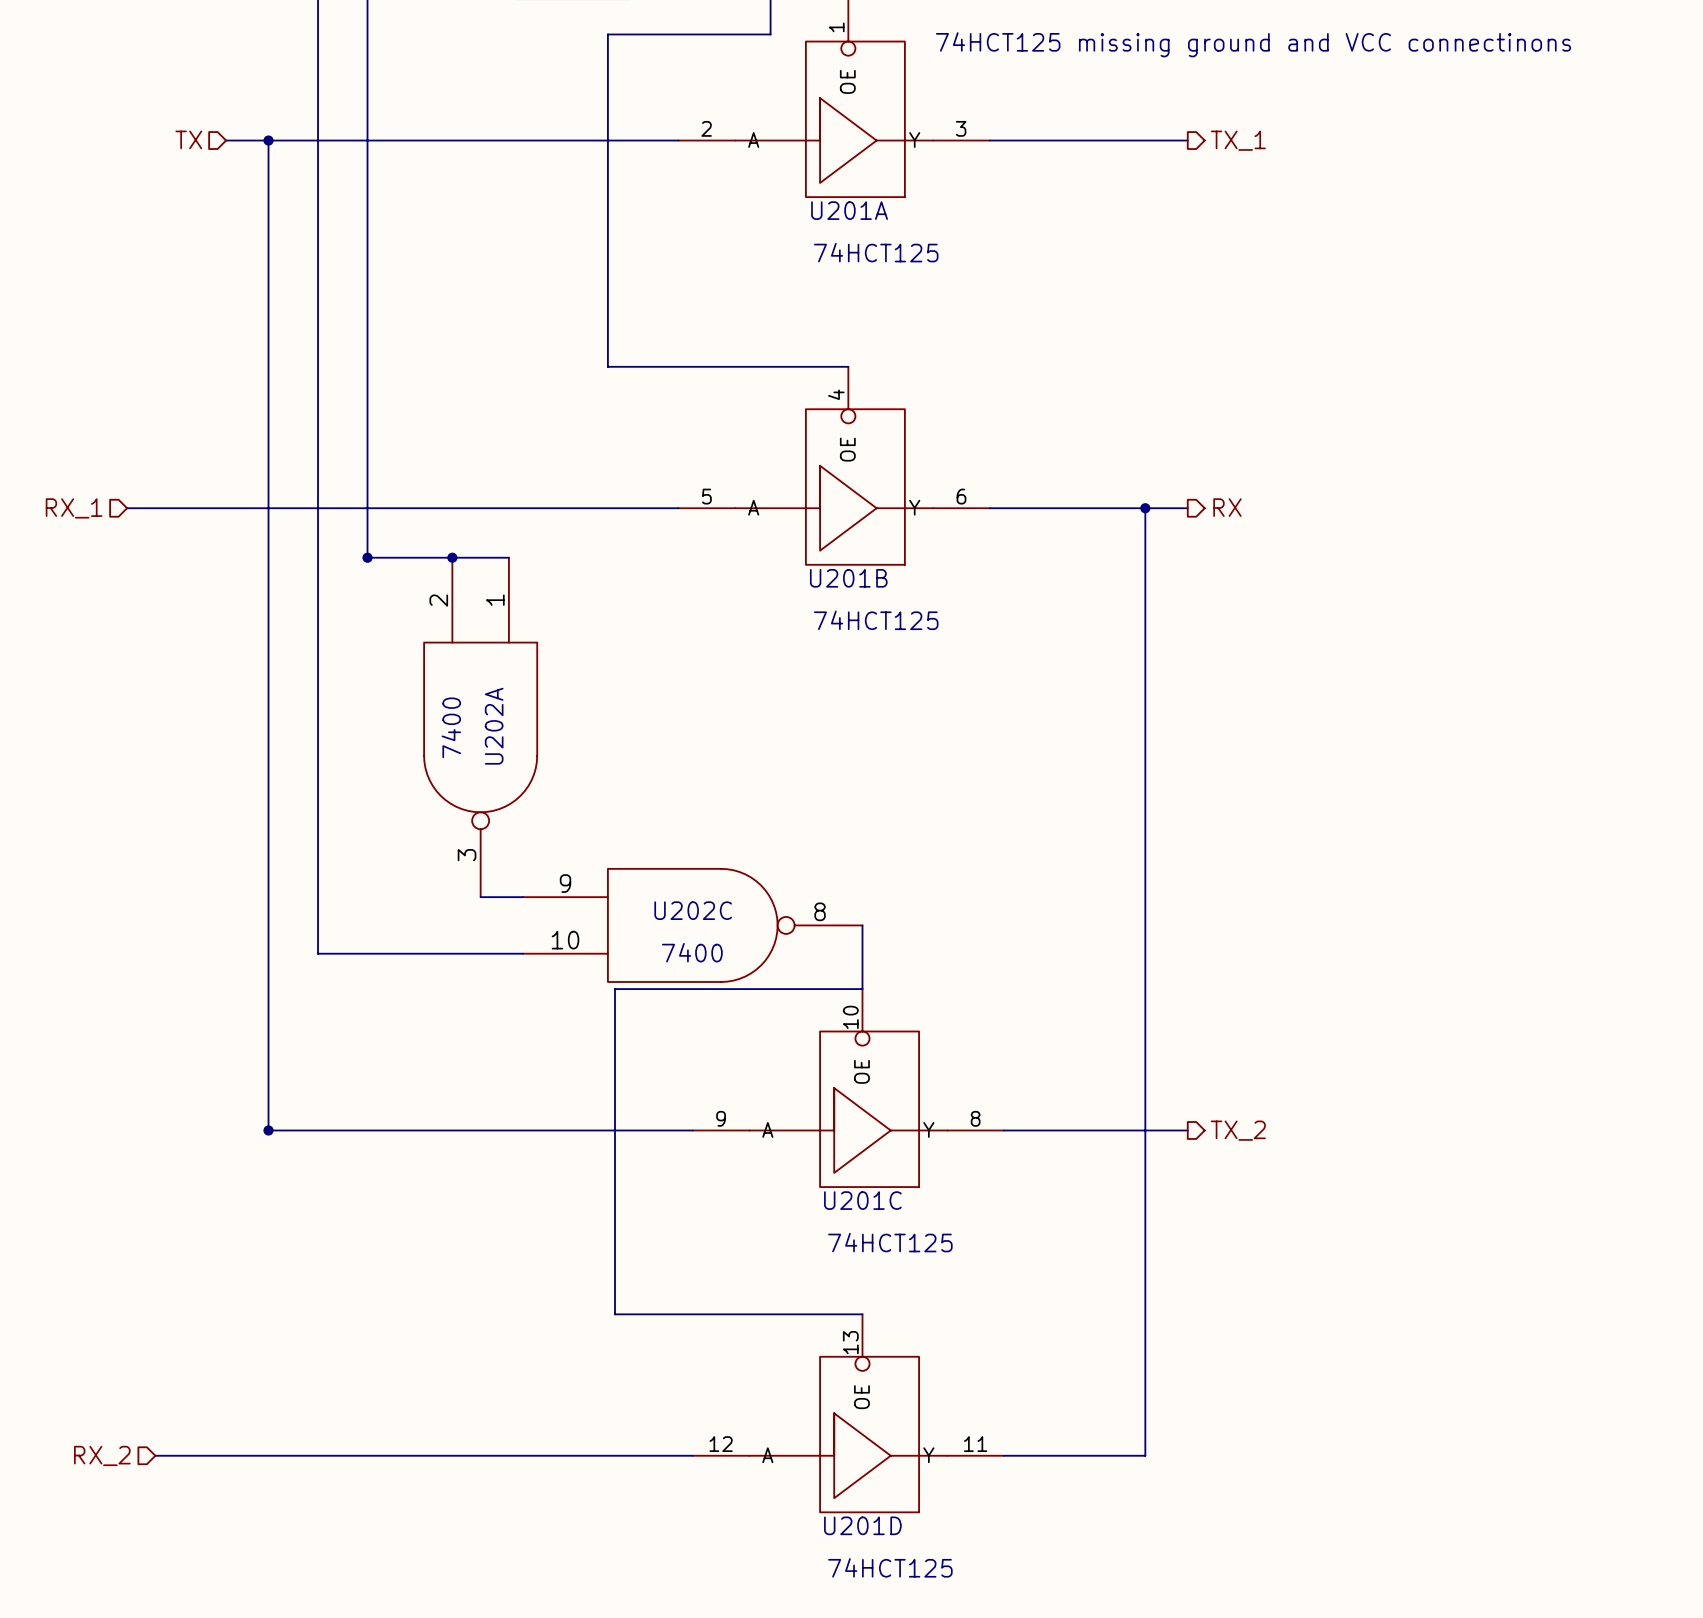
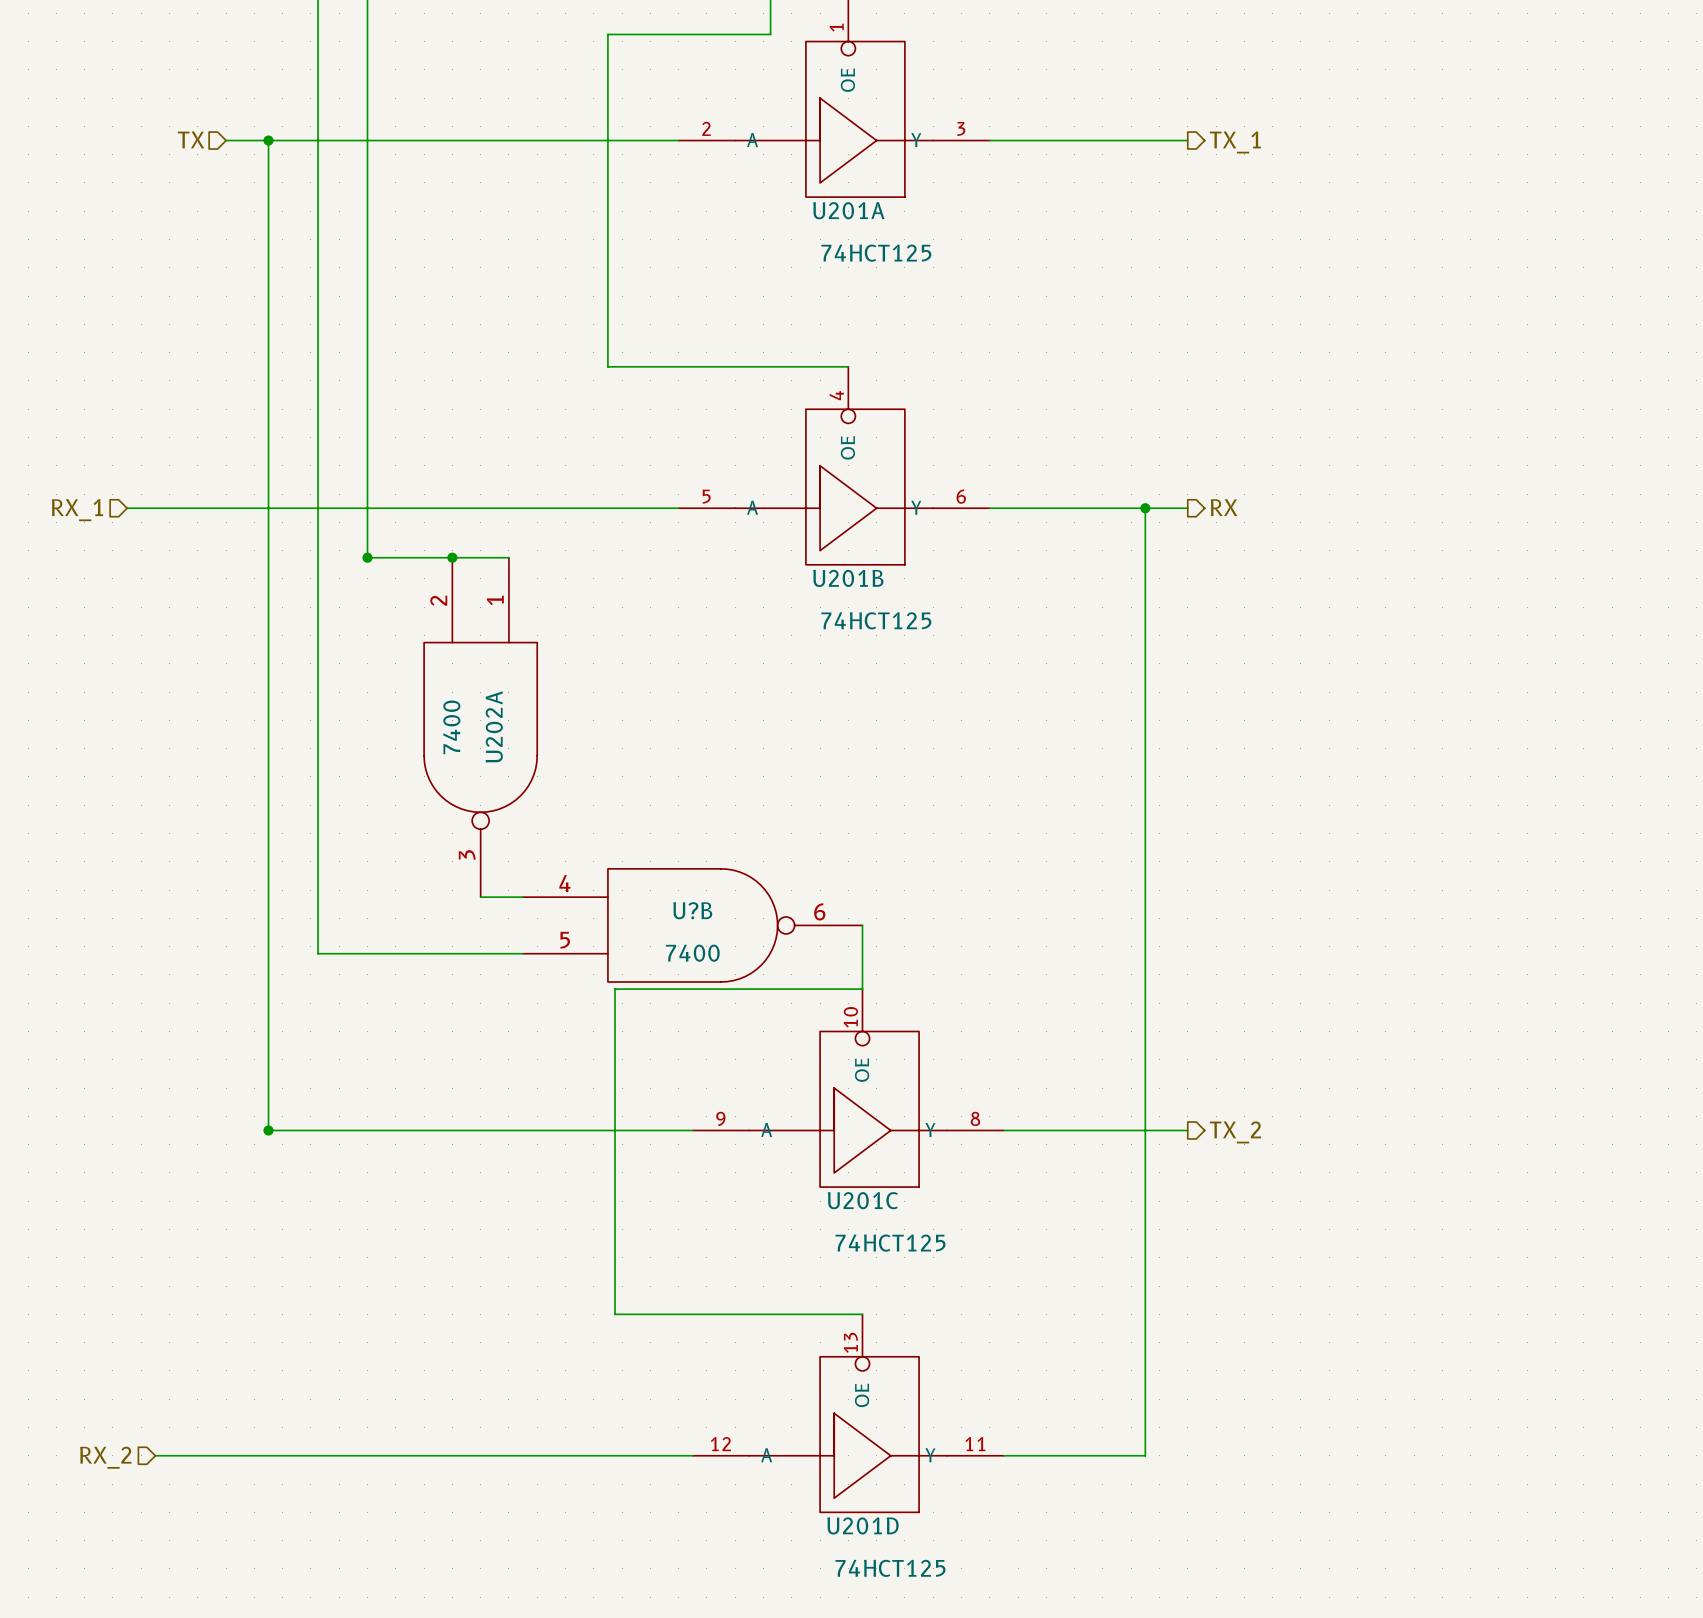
text: 74HCT125 missing ground and VCC connectinons (1253, 44) -> none
U202C pin number: 9 (565, 883) -> 4 (564, 883)
U202C name: U202C (693, 910) -> U?B (692, 910)
U202C pin number: 8 (820, 911) -> 6 (819, 911)
U202C pin number: 10 (565, 940) -> 5 (565, 940)

